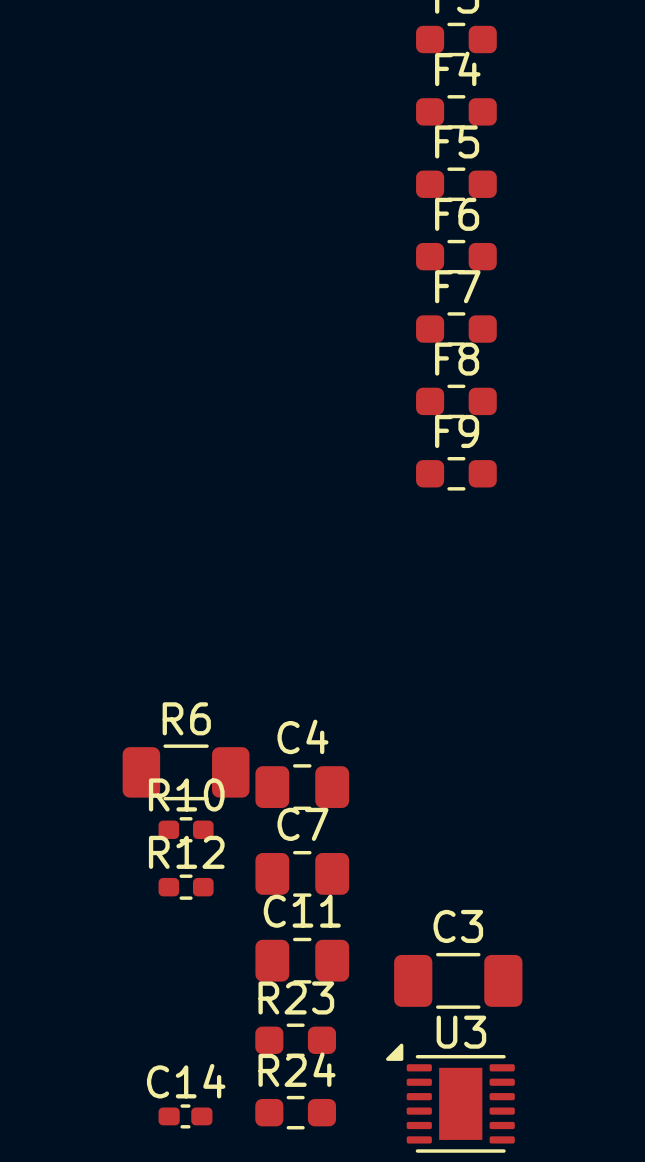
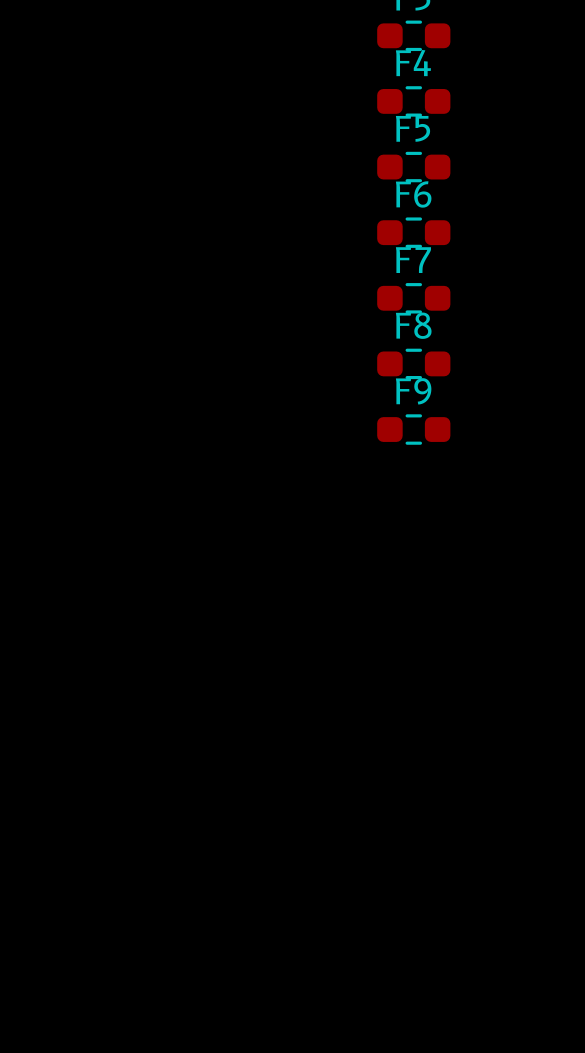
R6: (186, 772) -> none
C4: (302, 787) -> none
R10: (186, 829) -> none
C7: (302, 873) -> none
R12: (186, 887) -> none
C11: (302, 960) -> none
C3: (458, 980) -> none
R23: (295, 1040) -> none
U3: (450, 1098) -> none
R24: (295, 1112) -> none
C14: (185, 1116) -> none

